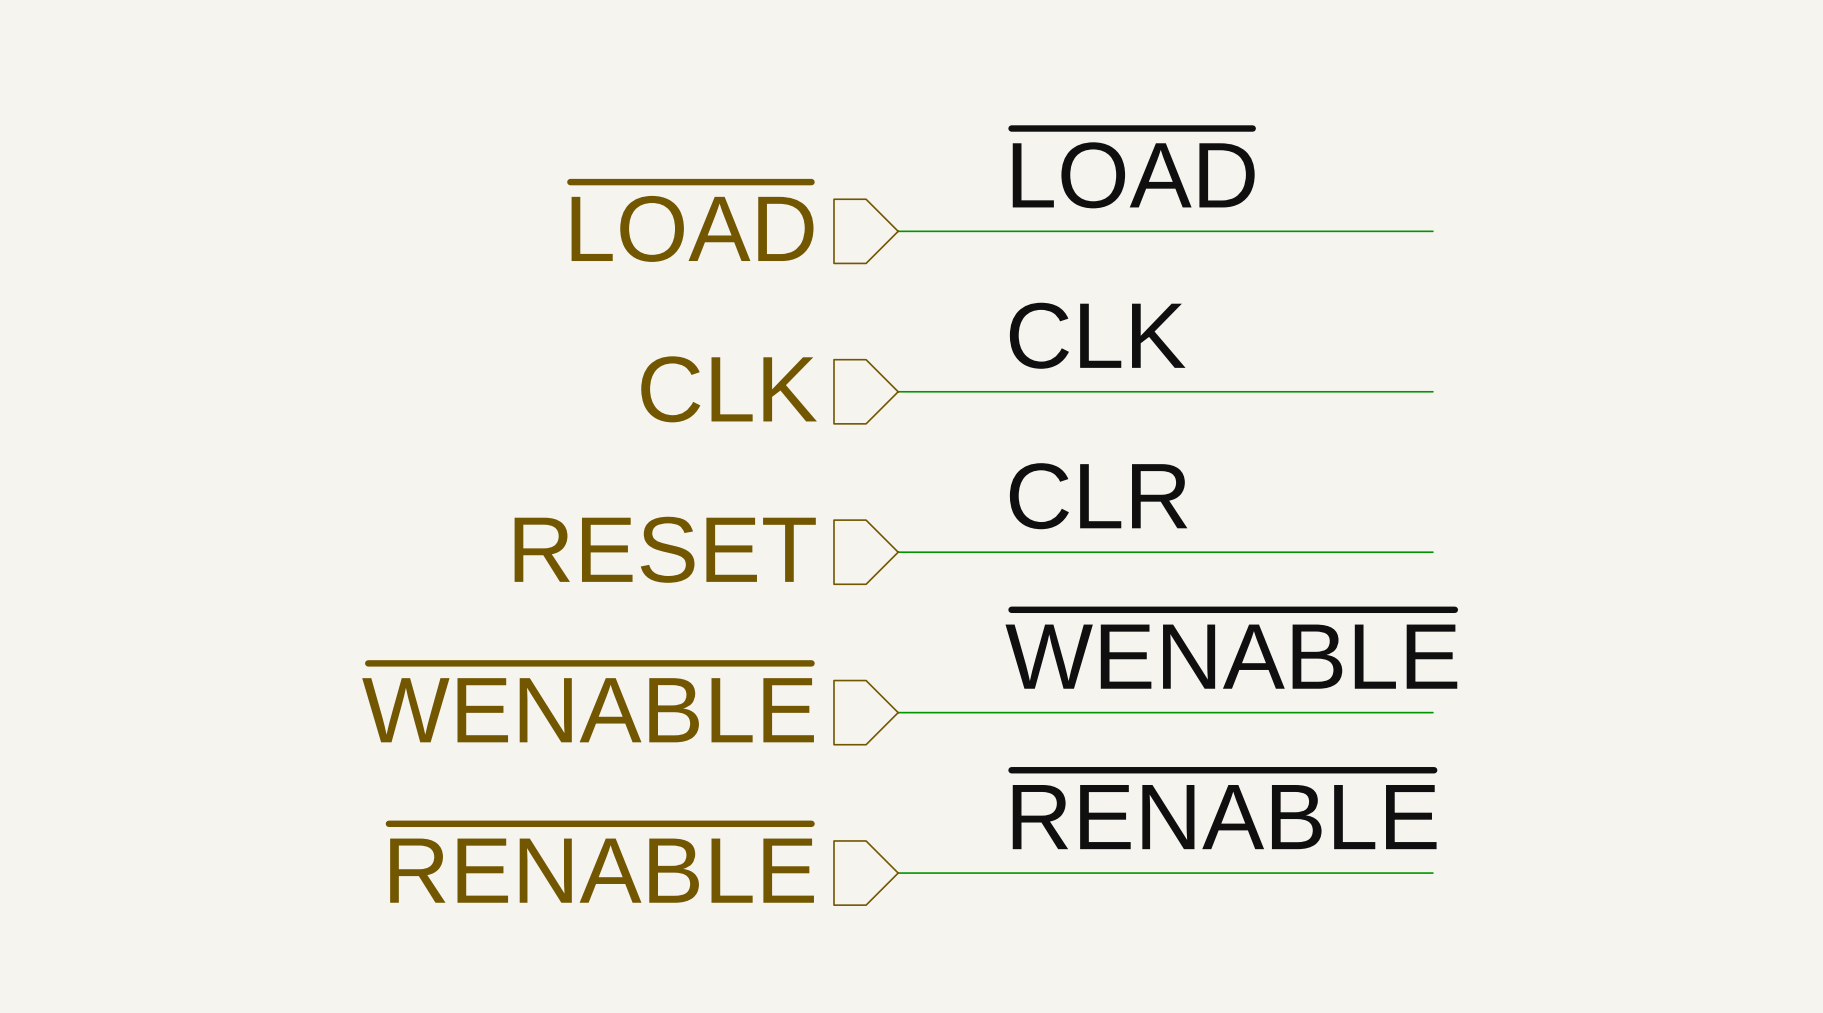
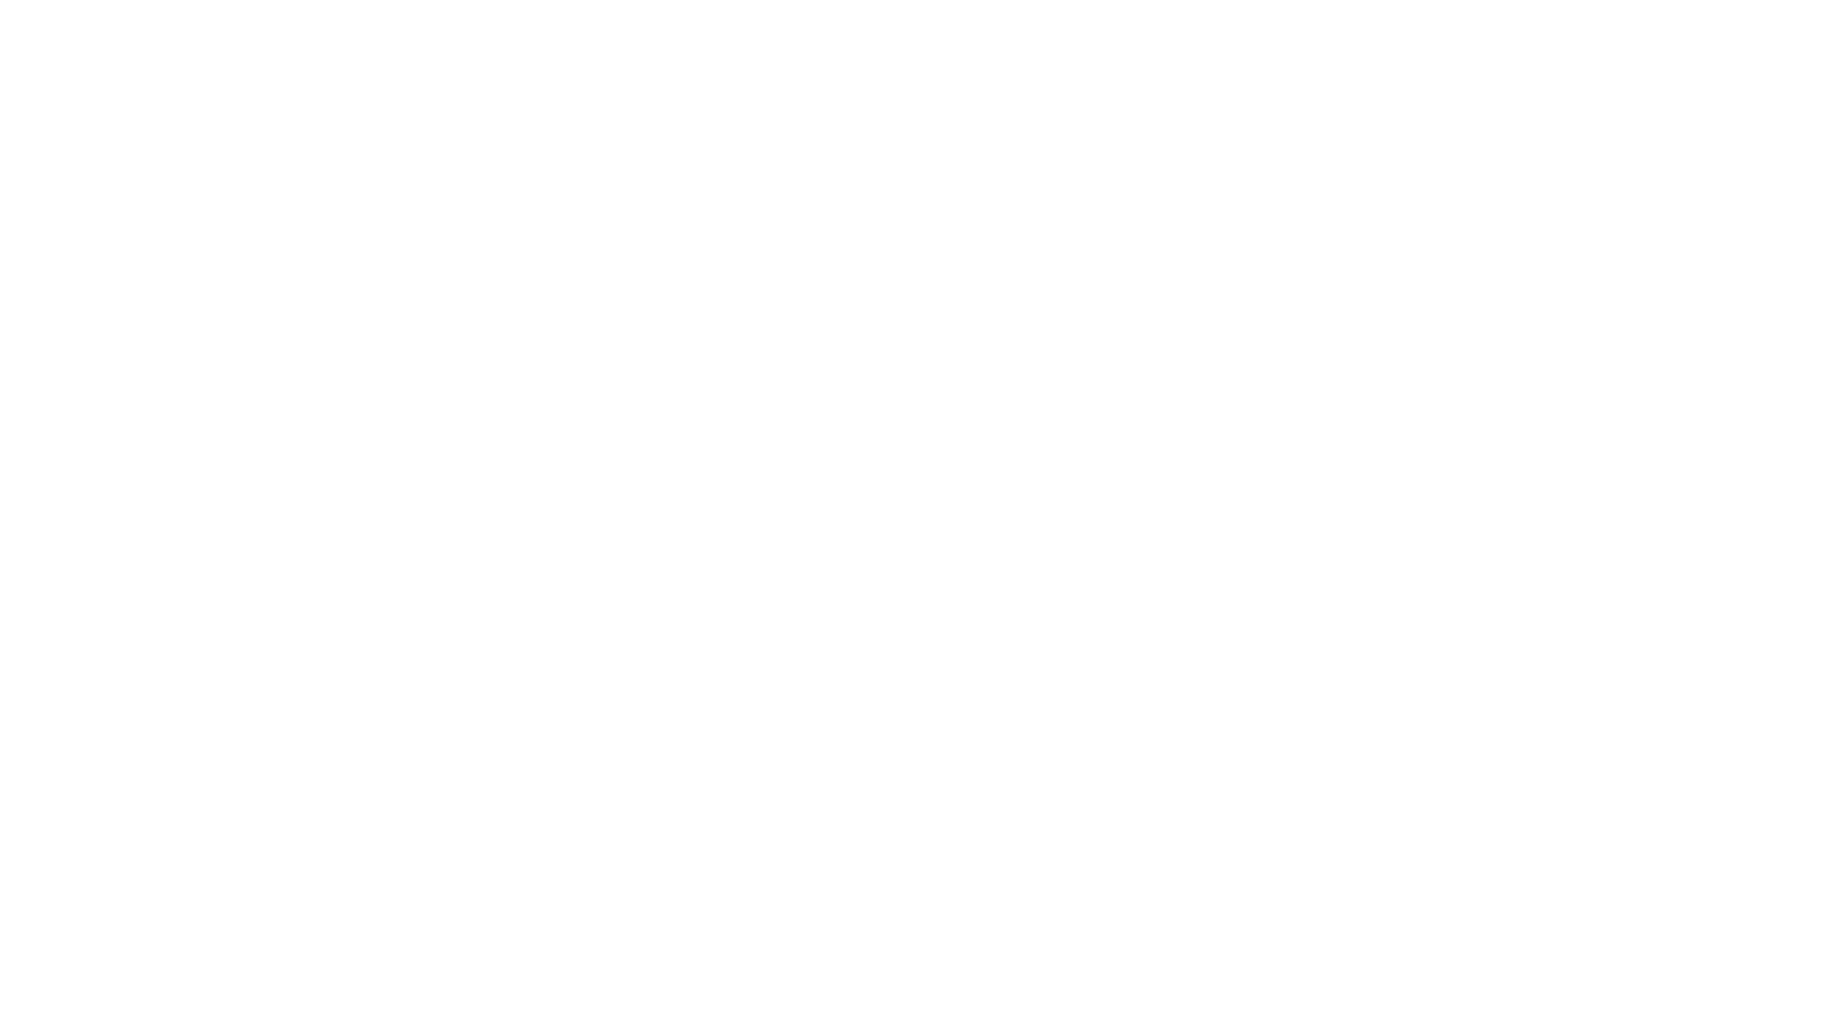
label: ~{LOAD} (1133, 168) -> none
hierarchical label: ~{LOAD} (691, 222) -> none
wire: (898, 231) (1432, 231) -> none
label: CLK (1097, 335) -> none
hierarchical label: CLK (729, 389) -> none
wire: (898, 391) (1432, 391) -> none
label: CLR (1098, 496) -> none
hierarchical label: RESET (665, 549) -> none
wire: (898, 552) (1432, 552) -> none
label: ~{WENABLE} (1231, 649) -> none
hierarchical label: ~{WENABLE} (588, 702) -> none
wire: (898, 712) (1432, 712) -> none
label: ~{RENABLE} (1224, 809) -> none
hierarchical label: ~{RENABLE} (601, 863) -> none
wire: (898, 873) (1432, 873) -> none

